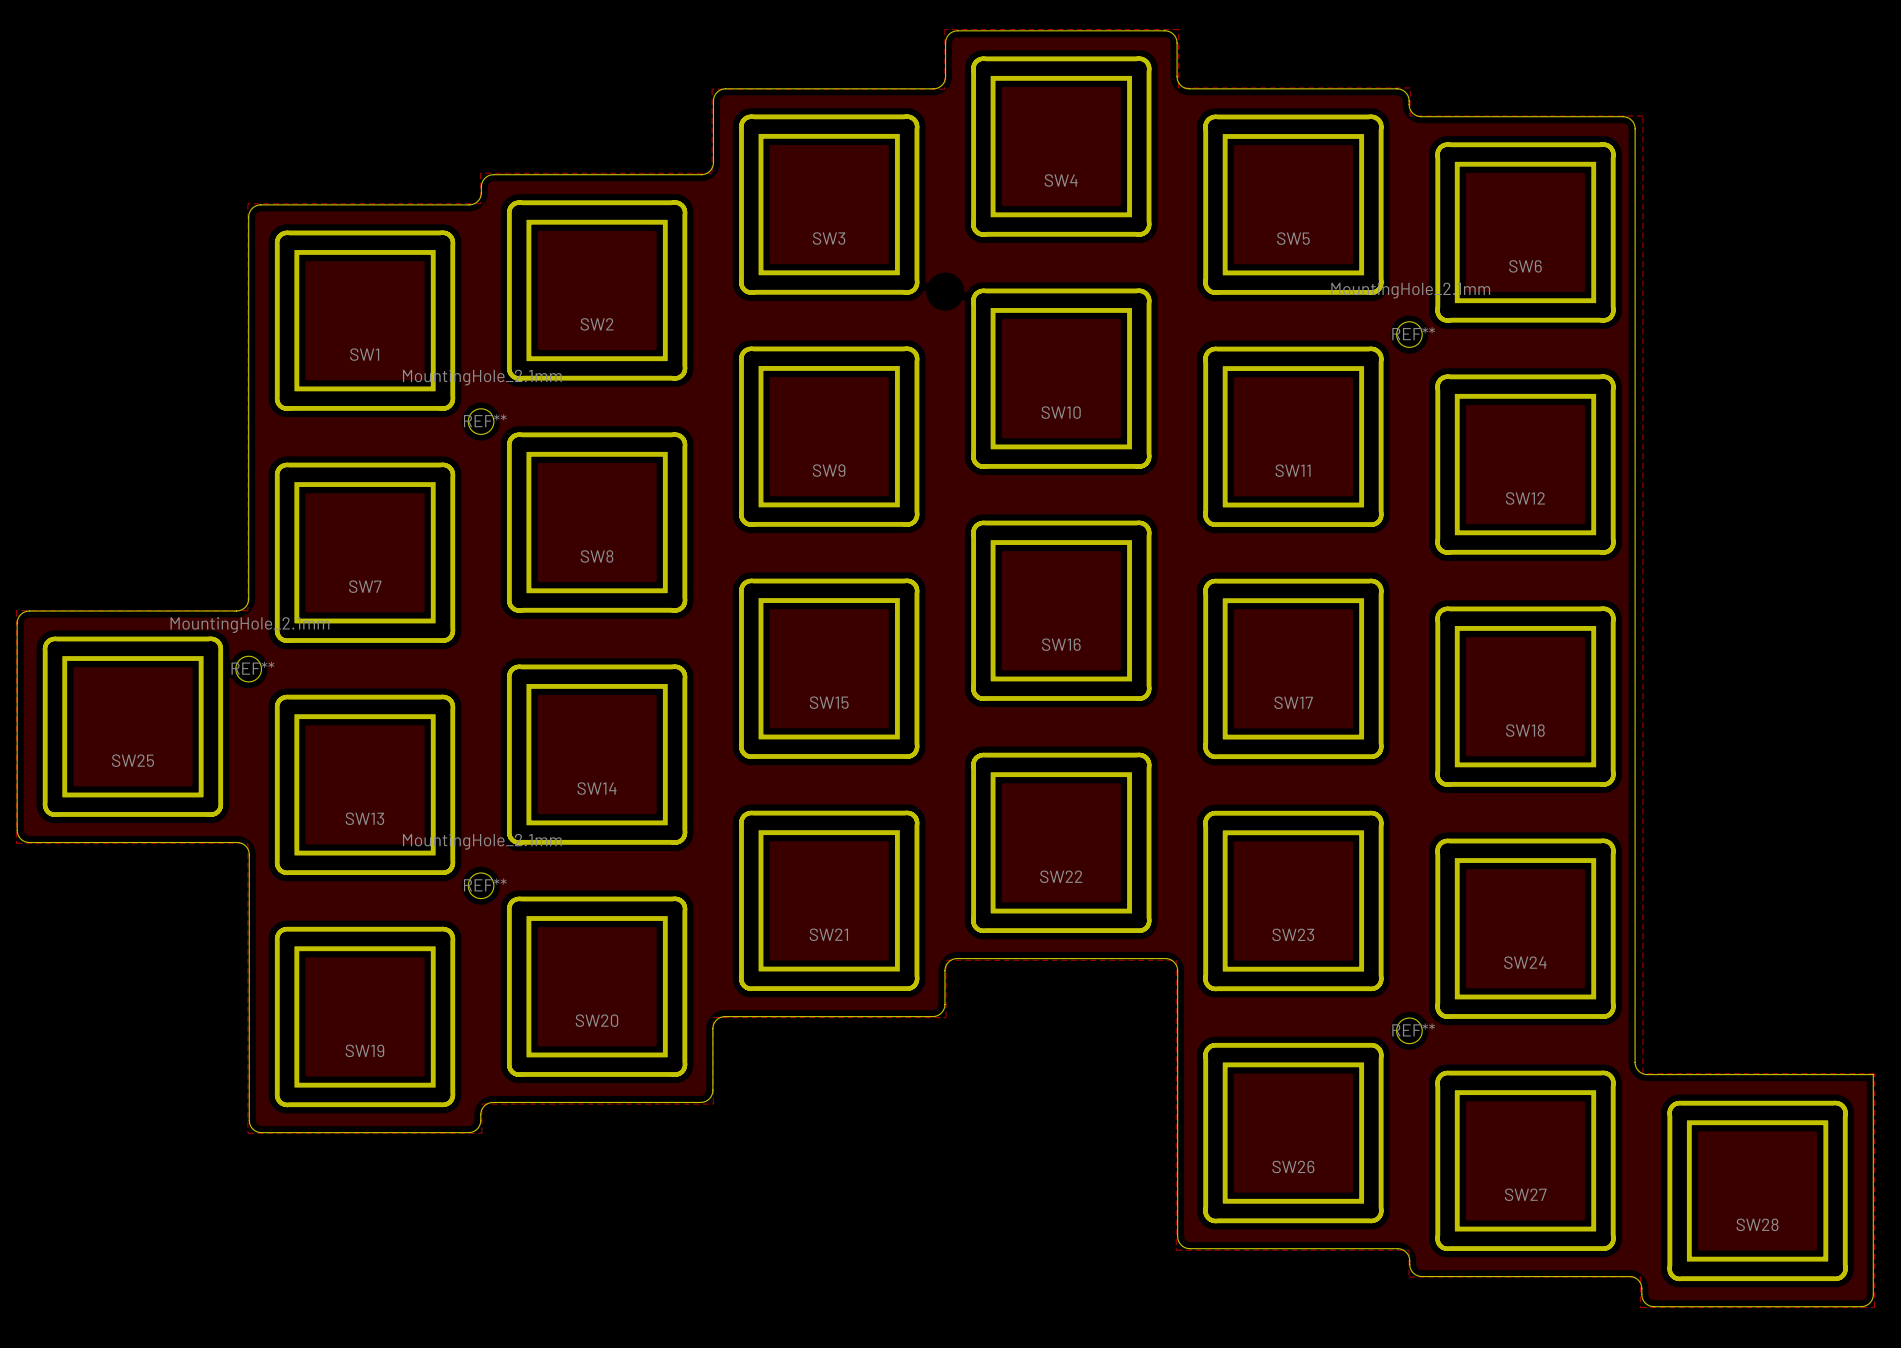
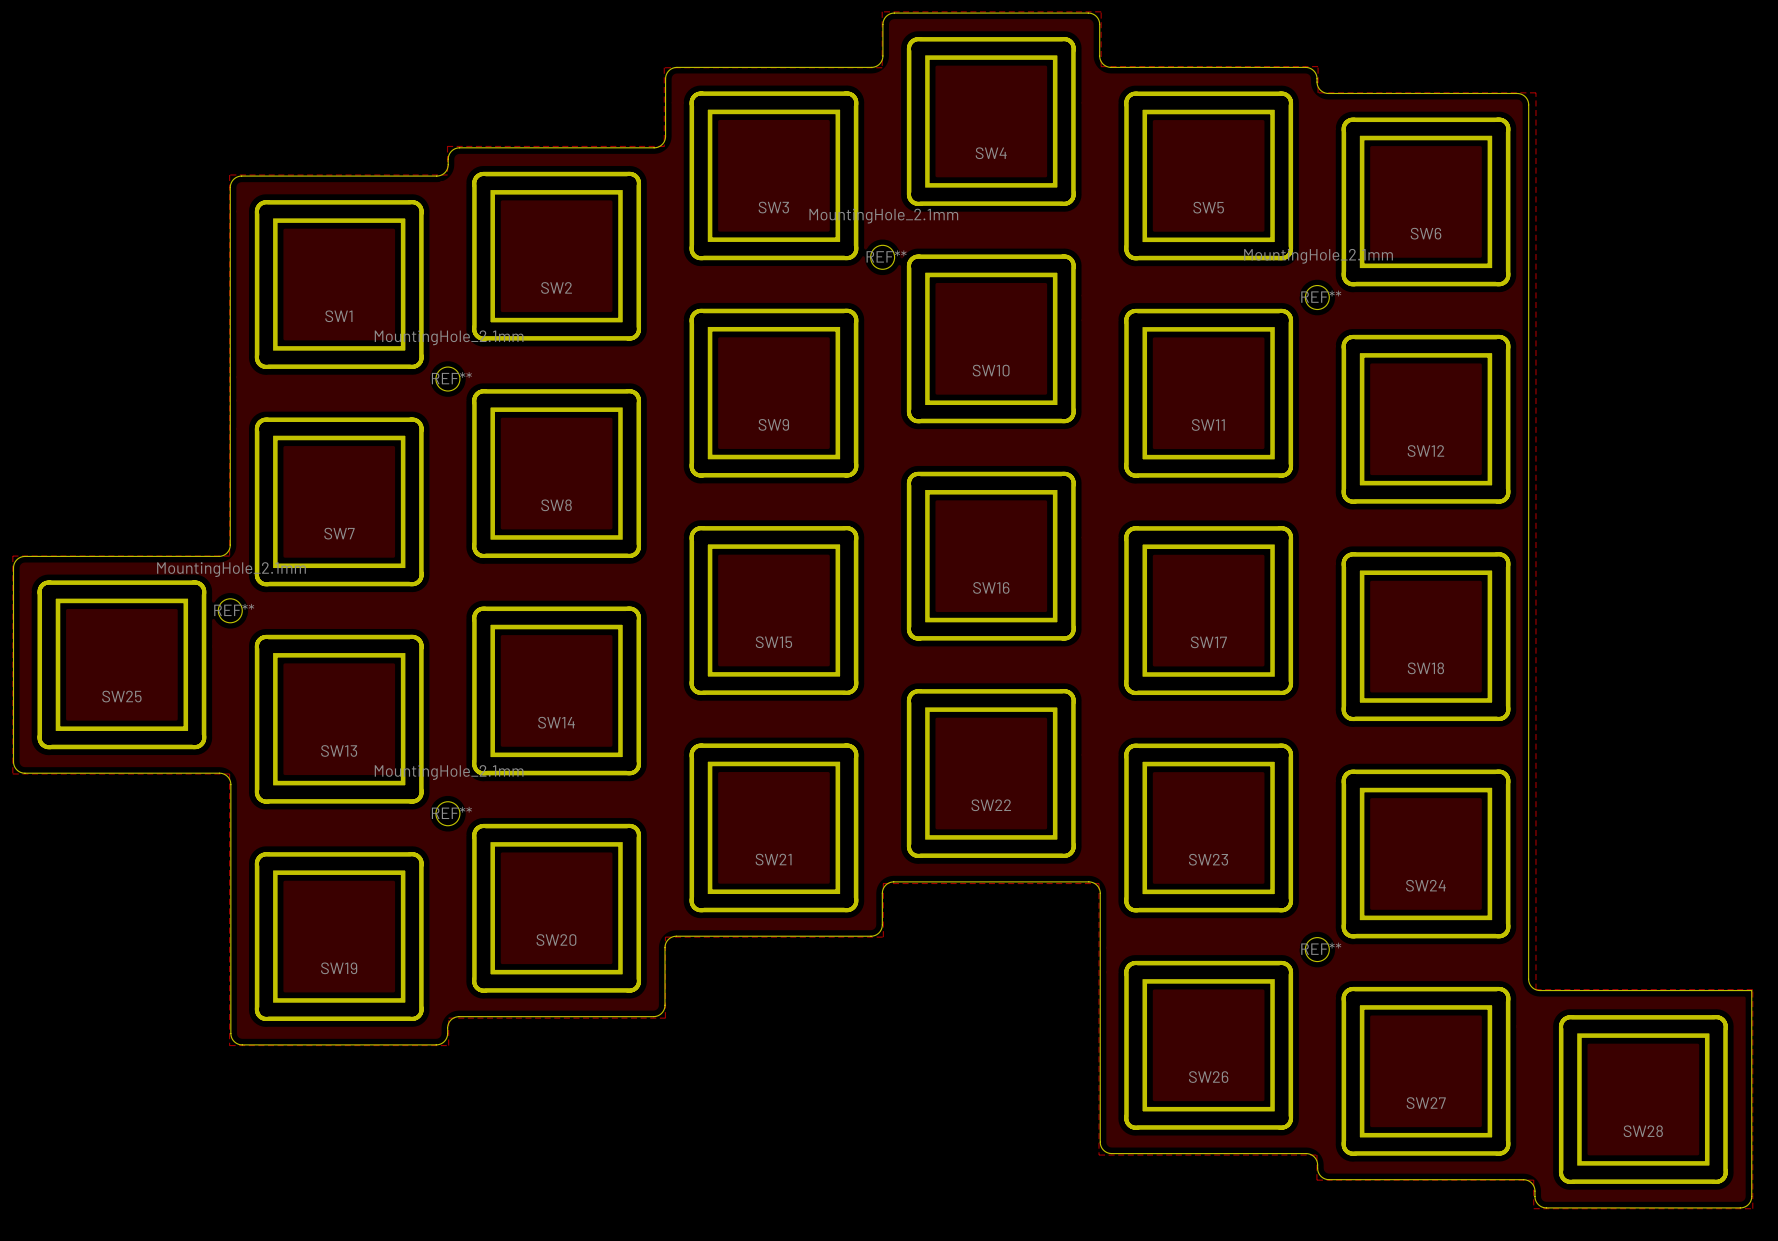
REF**: none -> MountingHole_2.1mm (882, 257)

